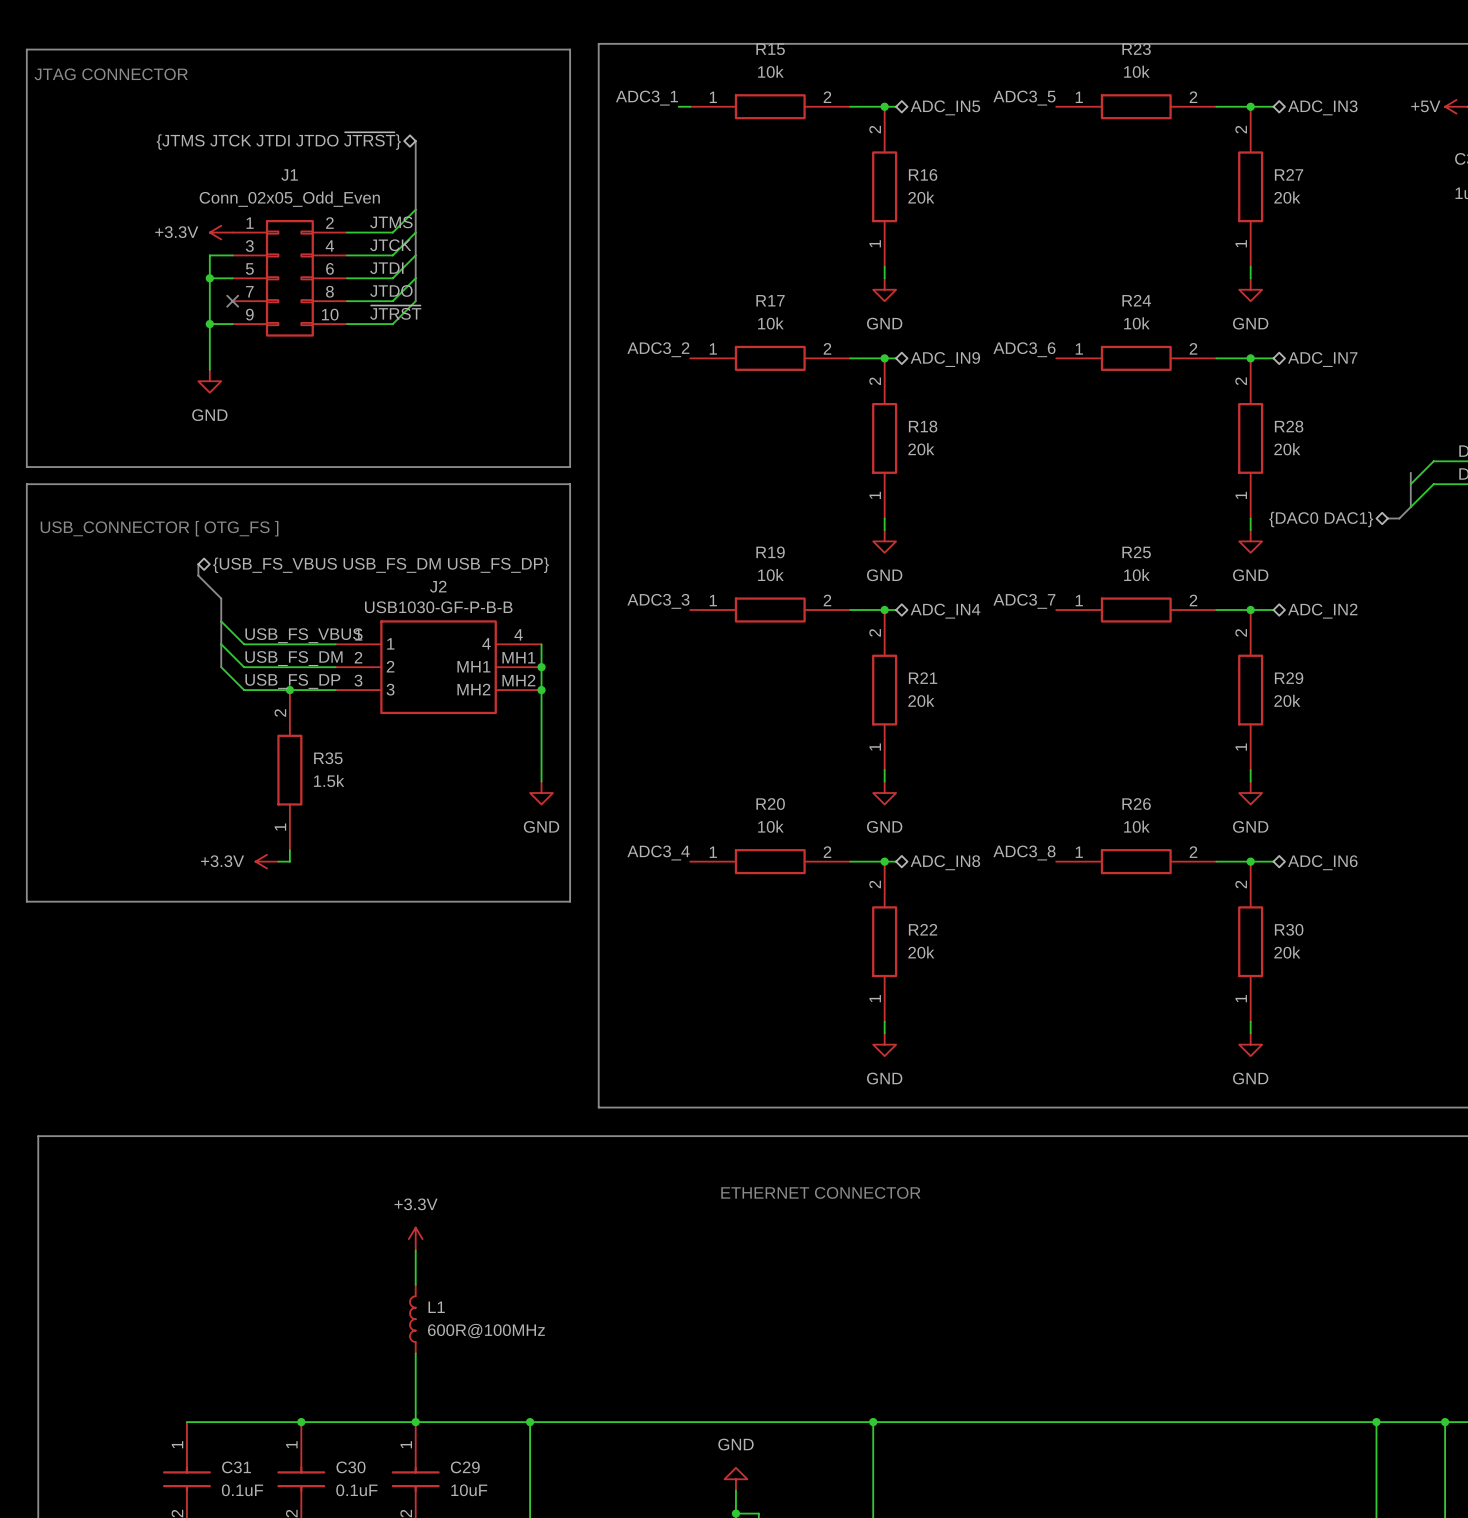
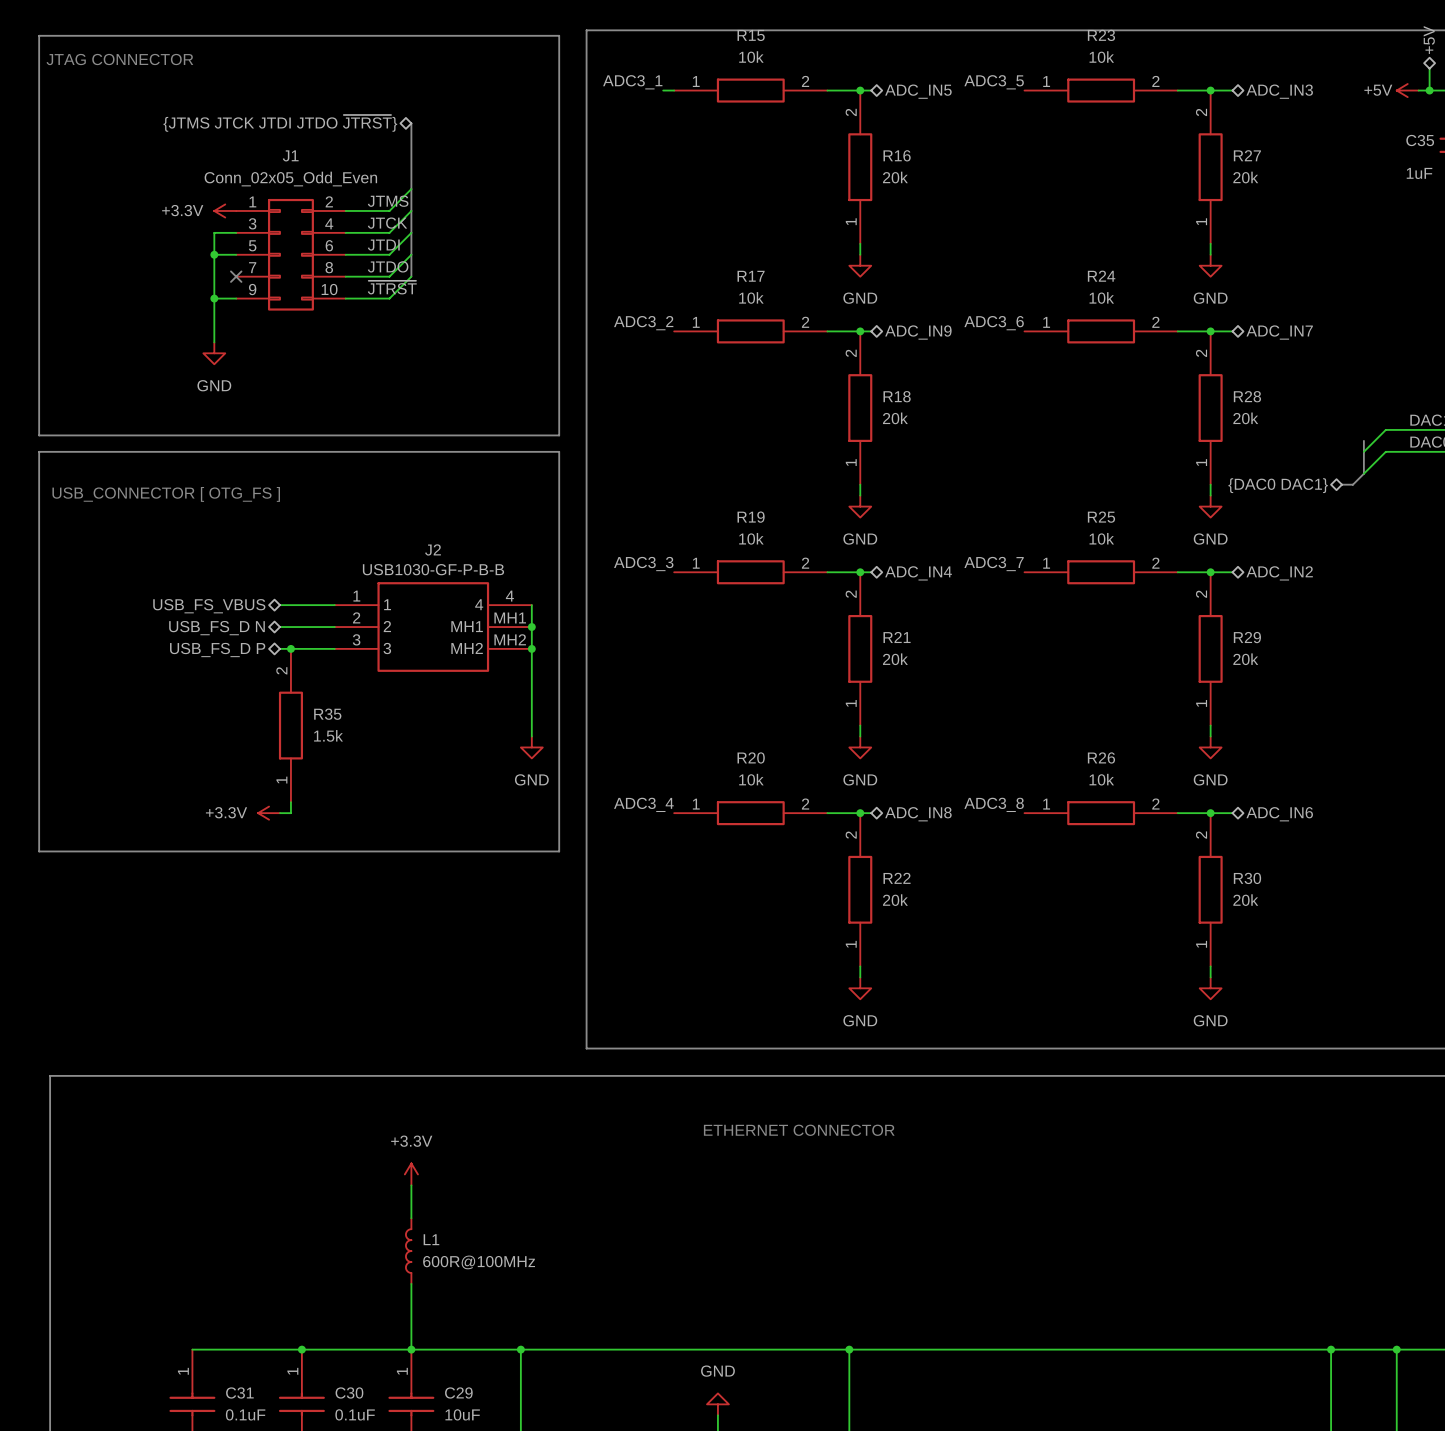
bus: (198, 564) (198, 575) (221, 598) (221, 667) -> none
hierarchical label: {USB_FS_VBUS USB_FS_DM USB_FS_DP} (381, 565) -> none
wire: (221, 621) (244, 644) (278, 644) -> none
label: USB_FS_VBUS (303, 635) -> none
wire: (221, 644) (244, 667) (278, 667) -> none
hierarchical label: none -> USB_FS_VBUS (209, 606)
label: USB_FS_DM (293, 658) -> none
wire: (221, 667) (244, 690) (278, 690) -> none
hierarchical label: none -> USB_FS_D N (216, 628)
label: USB_FS_DP (292, 681) -> none
hierarchical label: none -> USB_FS_D P (217, 650)

